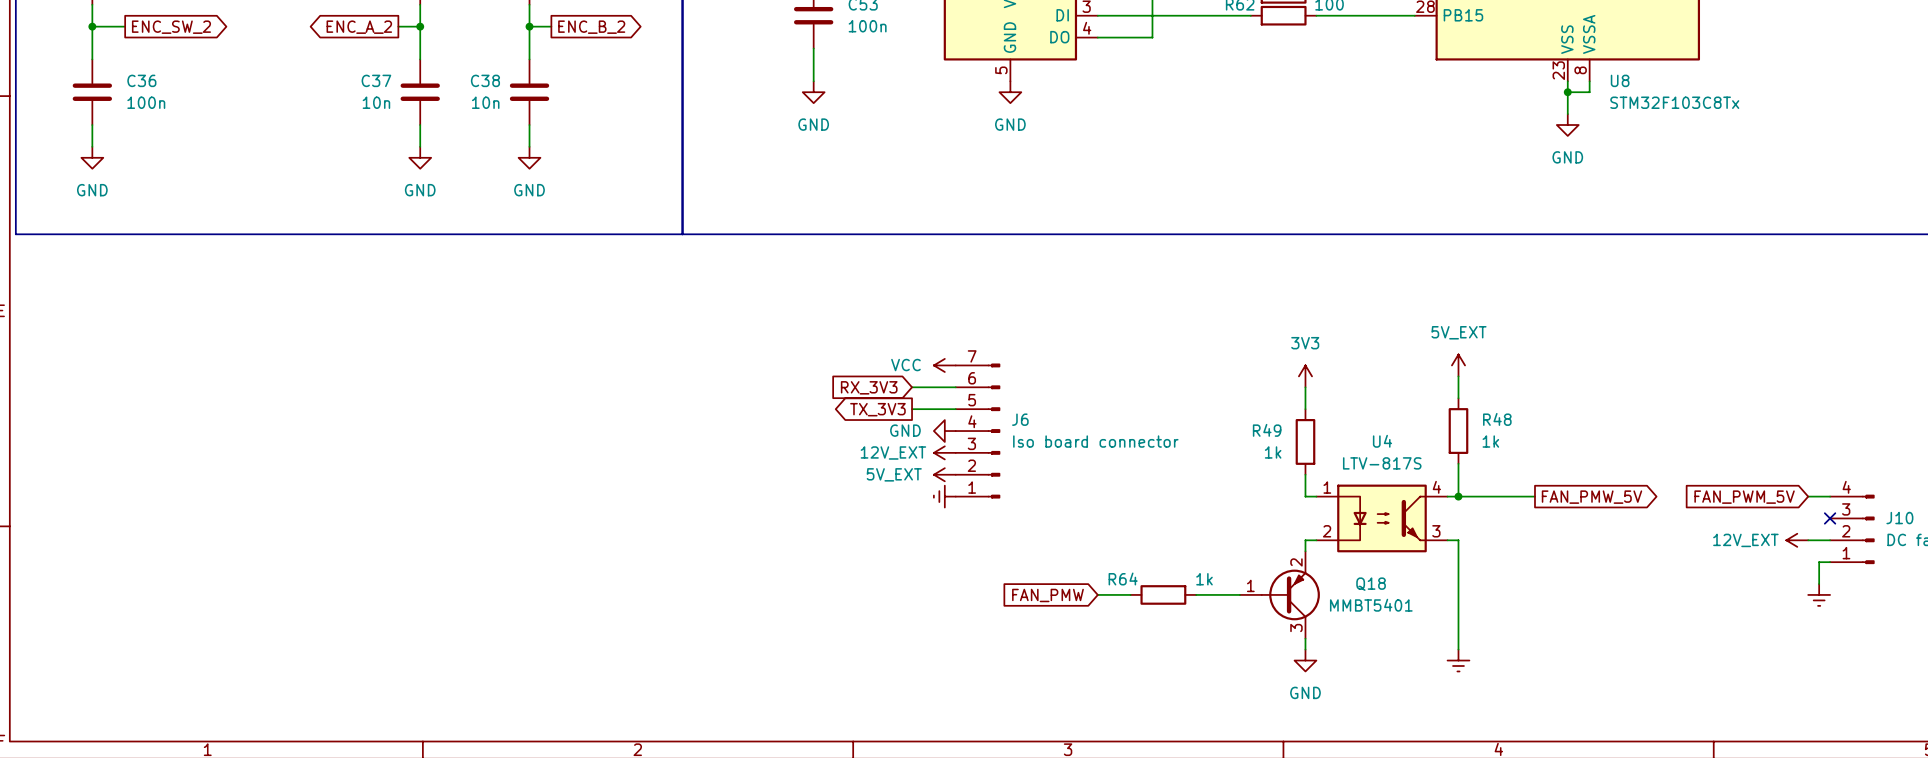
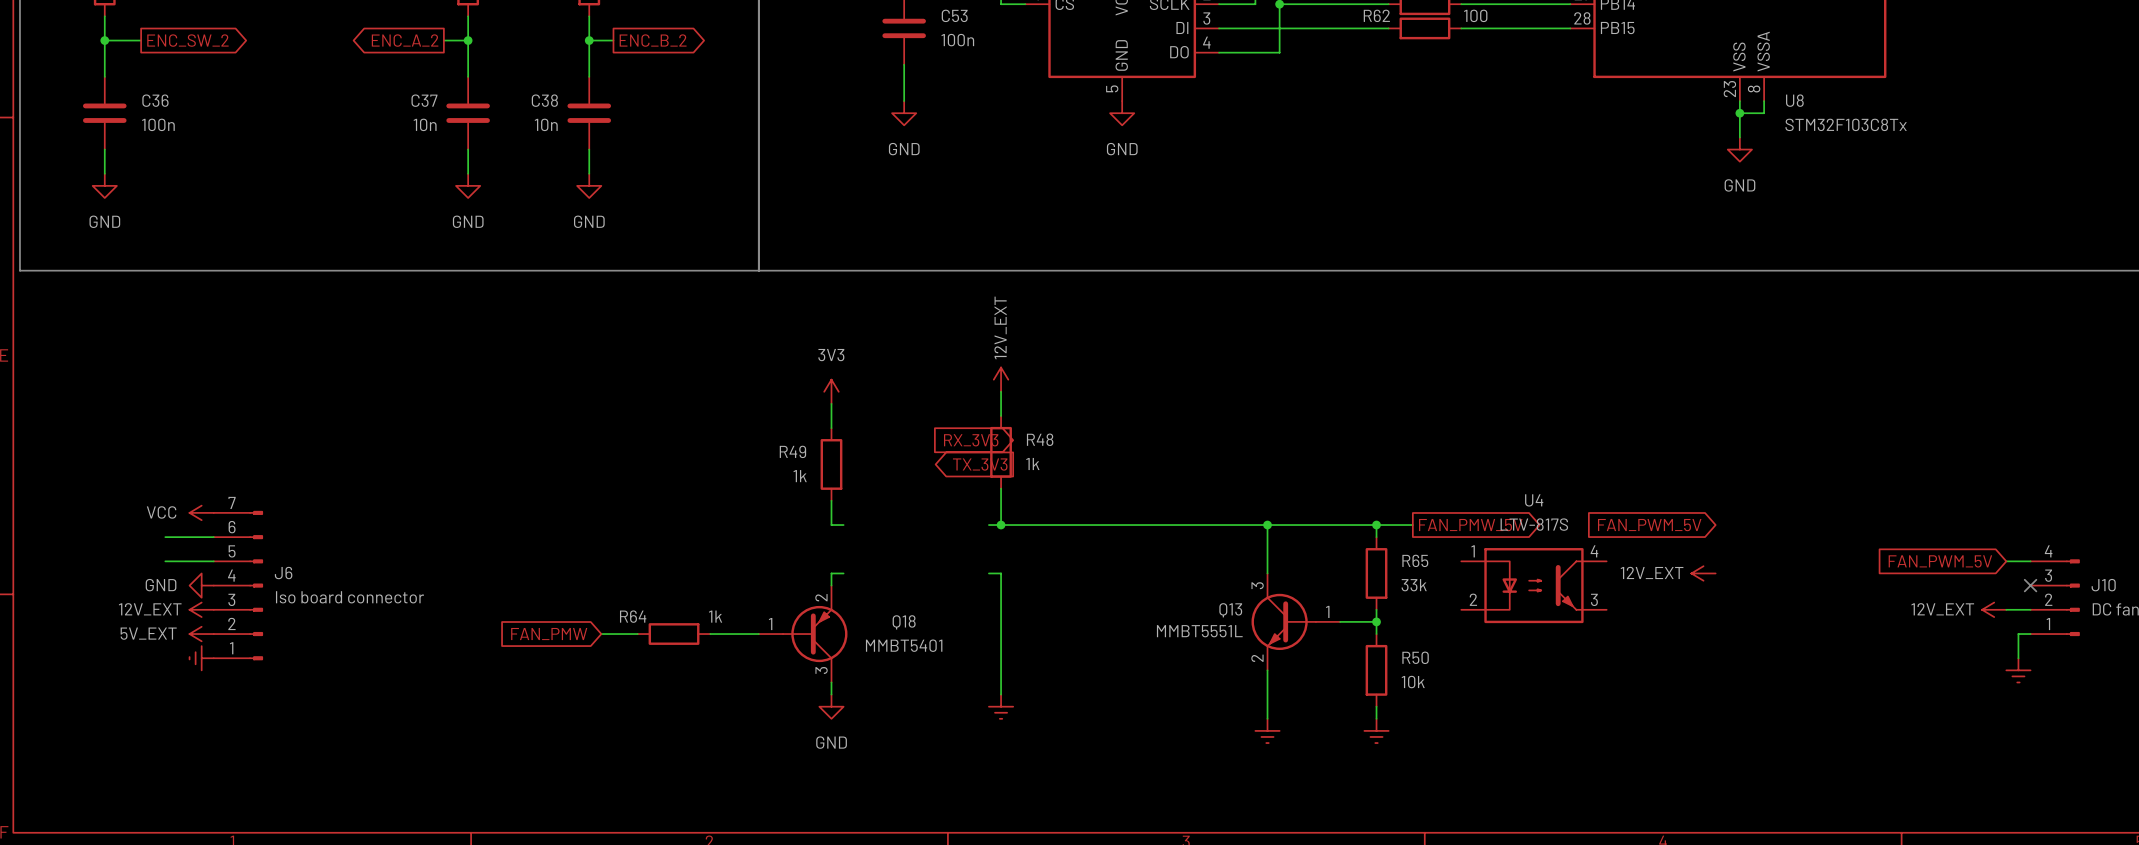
power symbol: none -> 3V3 (831, 391)
wire: none -> (1001, 391) (1001, 416)
wire: none -> (831, 403) (831, 428)
power symbol: VCC (944, 365) -> none
power symbol: 5V_EXT (1458, 365) -> none
power symbol: 3V3 (1305, 376) -> none
wire: (1458, 376) (1458, 398) -> none
wire: (912, 387) (955, 387) -> none
wire: (1305, 387) (1305, 409) -> (1376, 609) (1376, 634)
wire: (912, 409) (955, 409) -> none
wire: none -> (1001, 488) (1001, 525)
power symbol: GND (944, 431) -> none
J6 position: (977, 431) -> (238, 585)
R48 position: (1458, 431) -> (1001, 452)
wire: none -> (831, 500) (831, 525) (843, 525)
R49 position: (1305, 441) -> (831, 464)
power symbol: none -> VCC (201, 512)
power symbol rotation: 0° (944, 452) -> 90° clockwise (1001, 379)
power symbol position: 12V_EXT (944, 452) -> 12V_EXT (1001, 379)
wire: none -> (988, 525) (1412, 525)
junction: none -> (1001, 525)
wire: none -> (1267, 525) (1267, 573)
junction: none -> (1267, 525)
wire: none -> (1376, 525) (1376, 537)
junction: none -> (1376, 525)
wire: (1458, 463) (1458, 496) -> none
global label: none -> FAN_PMW_5V (1470, 525)
global label: none -> FAN_PWM_5V (1649, 525)
wire: none -> (165, 537) (213, 537)
power symbol: 5V_EXT (944, 474) -> none
wire: (1305, 474) (1305, 496) (1316, 496) -> none
wire: none -> (165, 561) (213, 561)
power symbol: (944, 496) -> none
wire: (1447, 496) (1534, 496) -> none
junction: (1458, 496) -> none
global label: FAN_PMW_5V (1591, 497) -> none
wire: none -> (843, 573) (831, 573) (831, 585)
wire: none -> (988, 573) (1001, 573) (1001, 694)
R65: none -> 33k (1376, 573)
power symbol: none -> 12V_EXT (1703, 573)
power symbol: none -> GND (201, 585)
power symbol: none -> 12V_EXT (201, 609)
wire: (1316, 540) (1305, 540) (1305, 551) -> none
wire: (1447, 540) (1458, 540) (1458, 649) -> none
Q13: none -> MMBT5551L (1295, 621)
junction: none -> (1376, 621)
power symbol: none -> 5V_EXT (201, 634)
global label: none -> FAN_PMW (549, 634)
wire: none -> (601, 634) (637, 634)
wire: none -> (710, 634) (758, 634)
power symbol: none -> (201, 658)
wire: (1097, 594) (1130, 594) -> (1340, 621) (1376, 621)
wire: none -> (1267, 670) (1267, 718)
R64 position: (1163, 594) -> (674, 634)
wire: (1196, 594) (1239, 594) -> none
R50: none -> 10k (1376, 670)
Q18 position: (1279, 594) -> (803, 634)
global label: FAN_PMW (1047, 595) -> none
wire: none -> (831, 682) (831, 694)
power symbol: none -> GND (831, 706)
power symbol: none -> (1001, 706)
wire: (1305, 638) (1305, 649) -> (1376, 706) (1376, 718)
power symbol: none -> (1267, 730)
power symbol: none -> (1376, 730)
power symbol: GND (1305, 660) -> none
power symbol: (1458, 660) -> none

